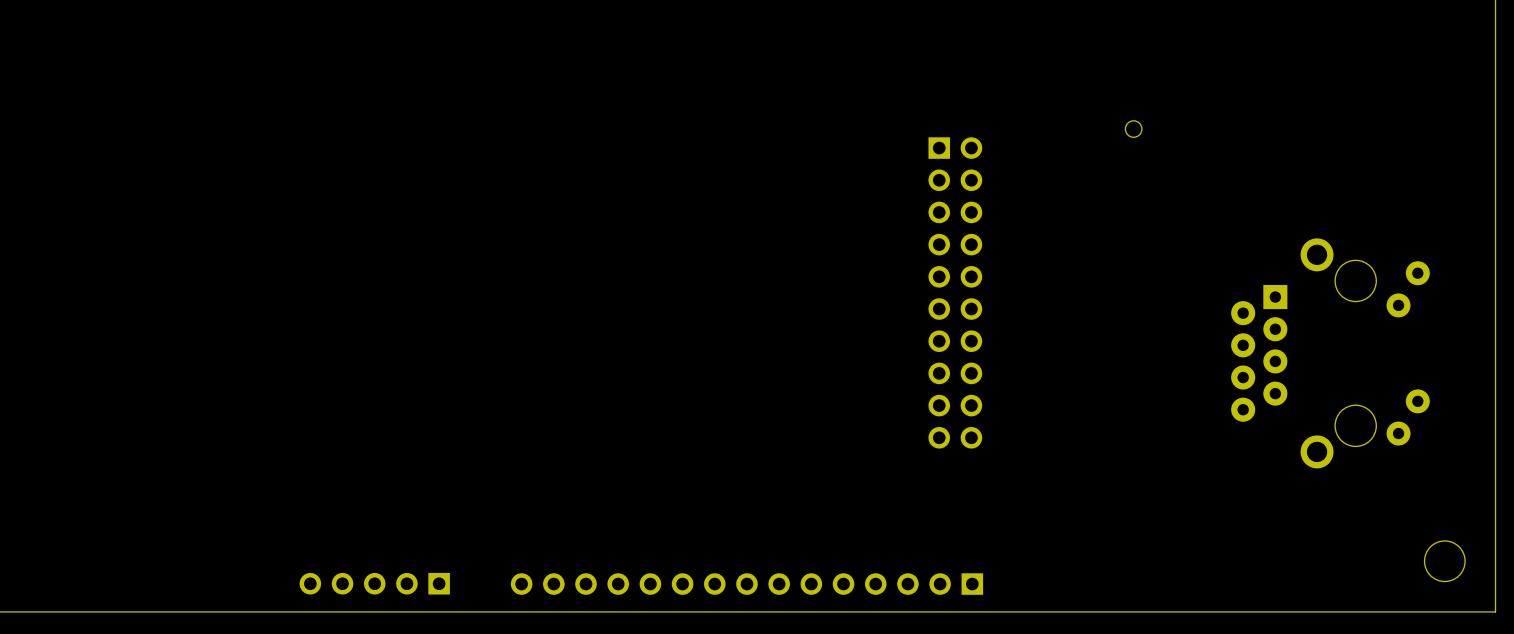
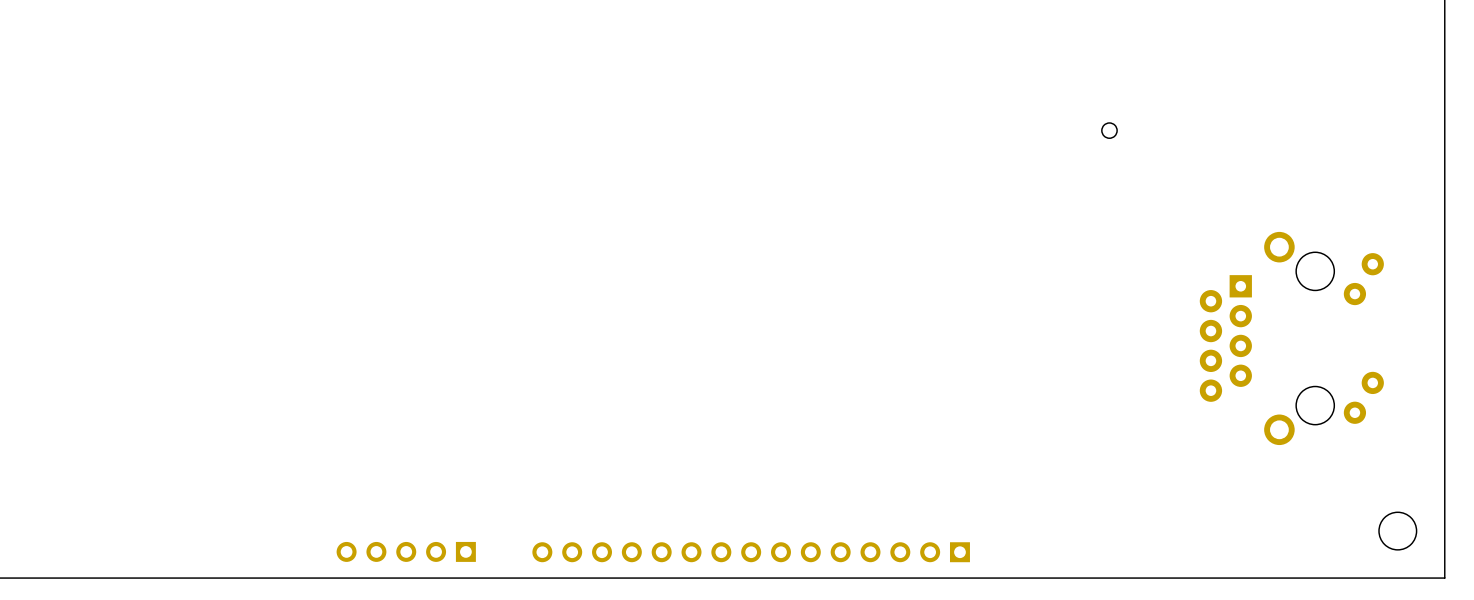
part: (955, 292) -> none

